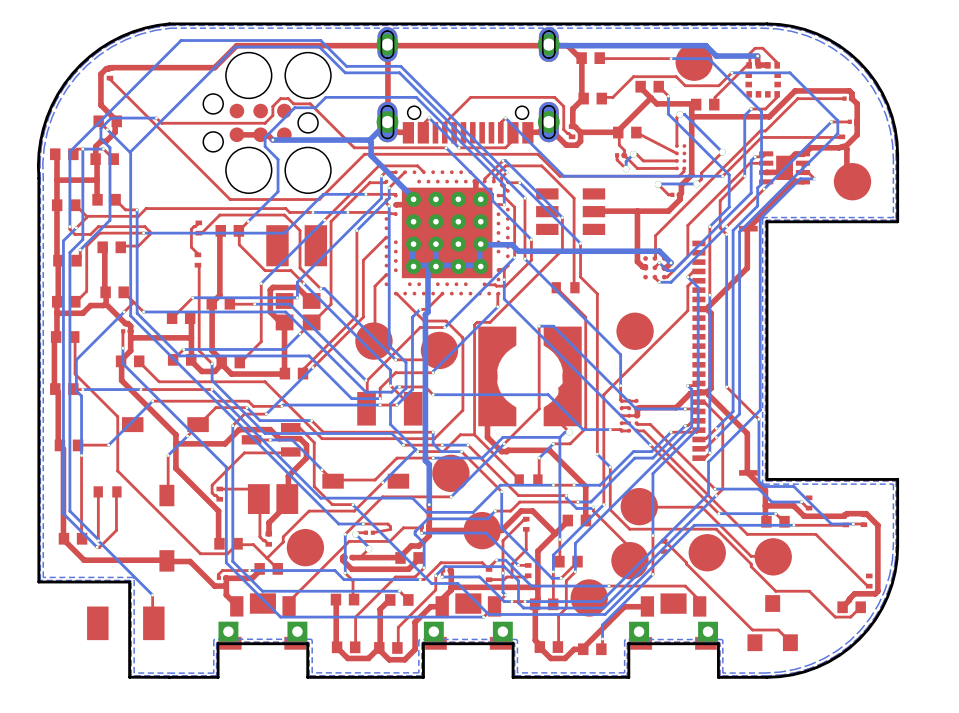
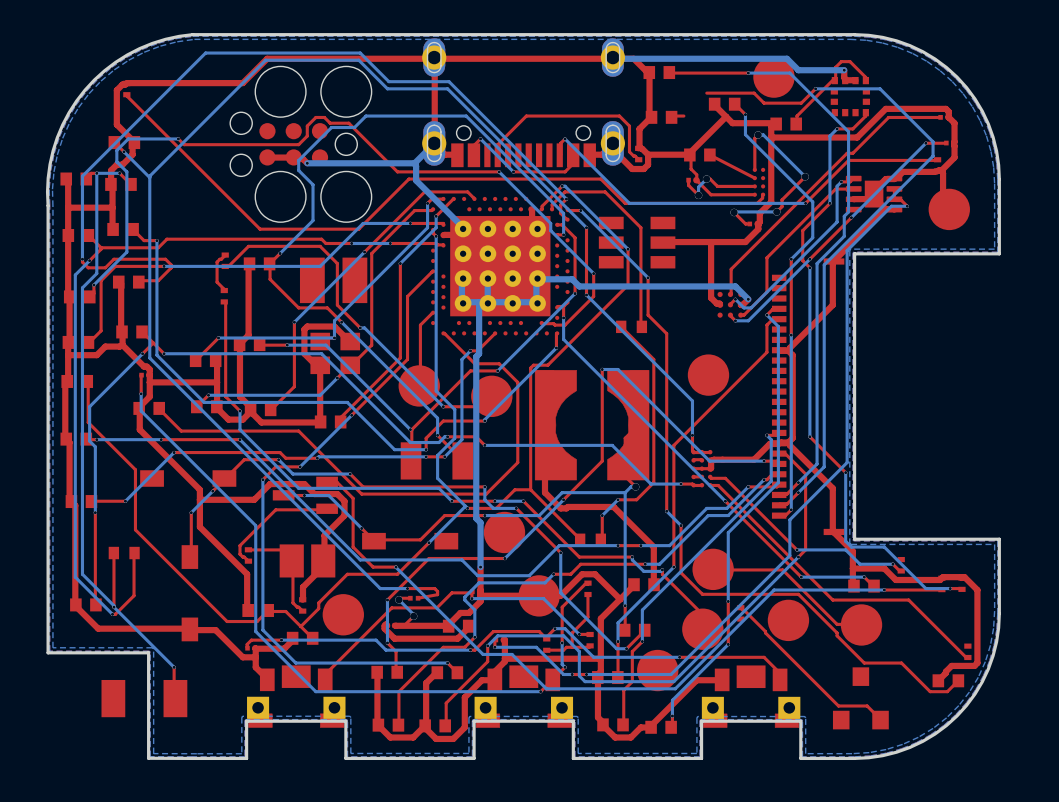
top track: (633, 76) (612, 97) -> none

